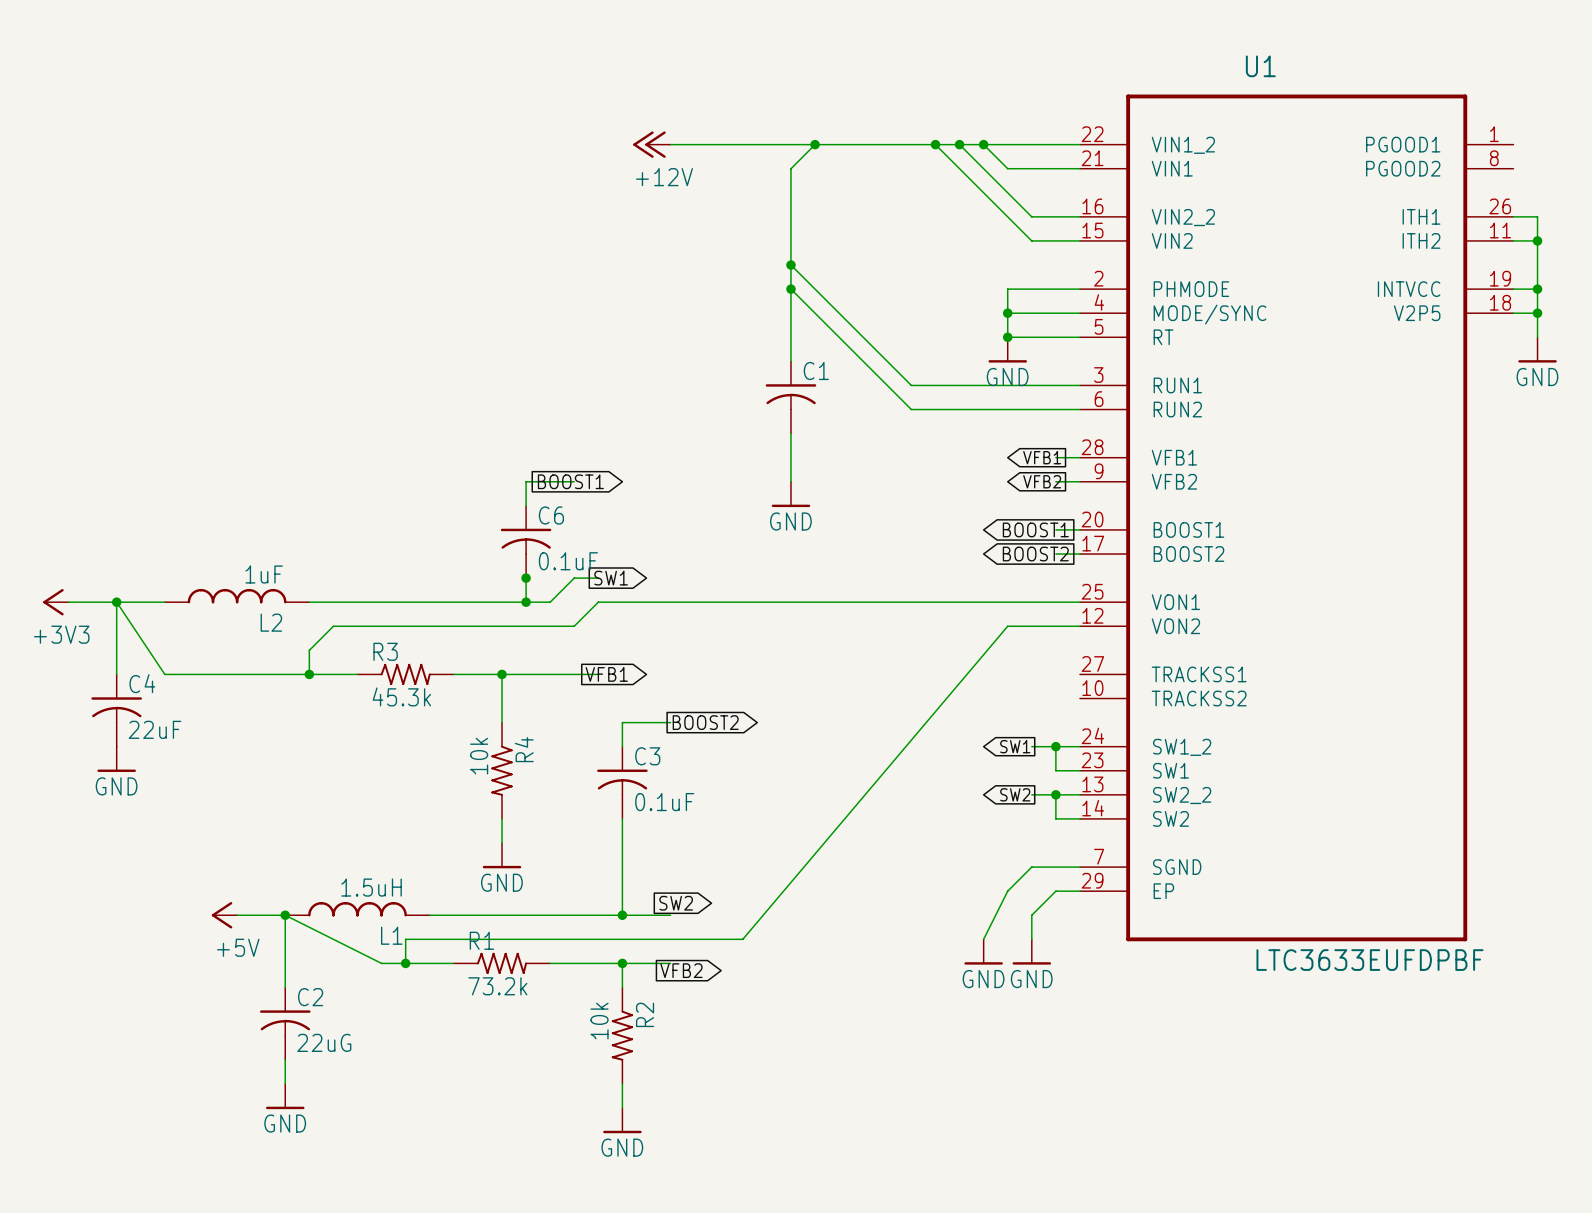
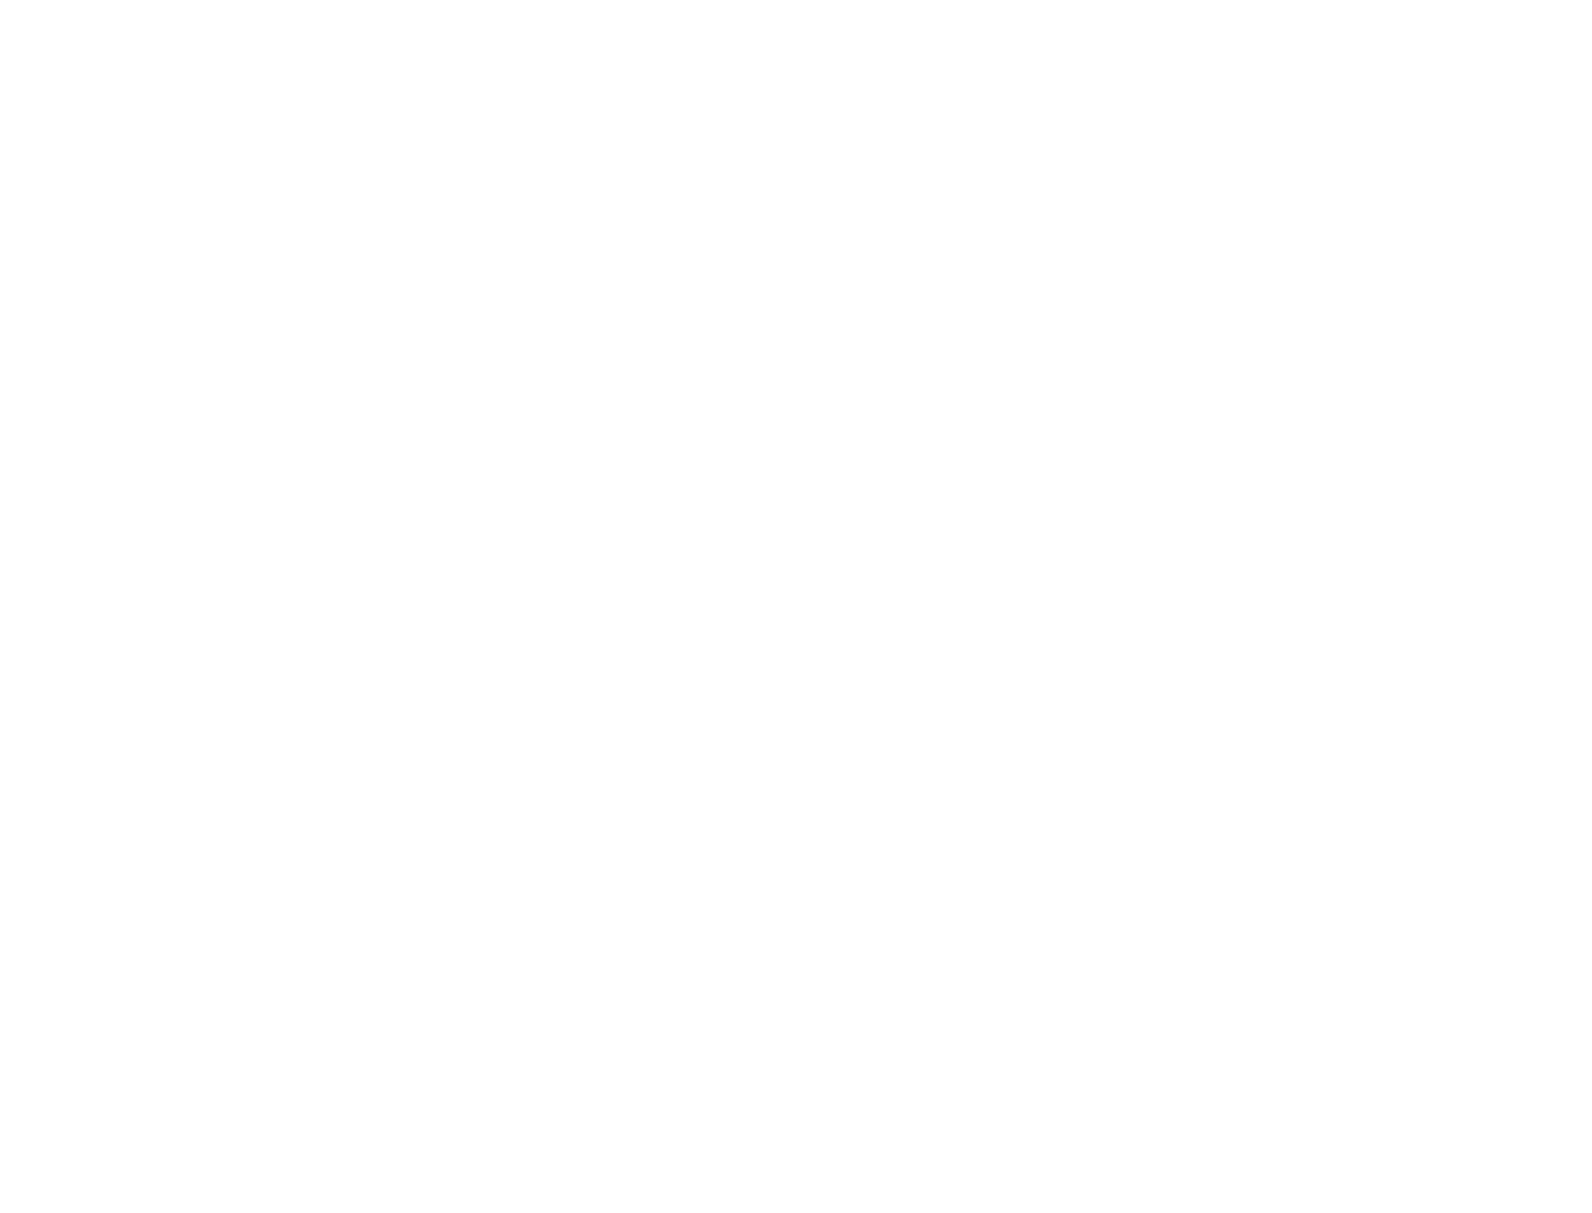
power symbol: +12V (651, 144) -> none
wire: (670, 144) (1079, 144) -> none
wire: (815, 144) (790, 168) (790, 361) -> none
junction: (815, 144) -> none
wire: (935, 144) (1031, 240) (1079, 240) -> none
junction: (935, 144) -> none
wire: (959, 144) (1031, 216) (1079, 216) -> none
junction: (959, 144) -> none
wire: (983, 144) (1007, 168) (1079, 168) -> none
junction: (983, 144) -> none
wire: (1513, 216) (1537, 216) (1537, 337) -> none
wire: (1513, 240) (1537, 240) -> none
junction: (1537, 240) -> none
wire: (790, 265) (911, 385) (1079, 385) -> none
junction: (790, 265) -> none
wire: (790, 289) (911, 409) (1079, 409) -> none
junction: (790, 289) -> none
wire: (1079, 289) (1007, 289) (1007, 337) (1079, 337) -> none
wire: (1513, 289) (1537, 289) -> none
junction: (1537, 289) -> none
wire: (1007, 313) (1079, 313) -> none
junction: (1007, 313) -> none
wire: (1513, 313) (1537, 313) -> none
junction: (1537, 313) -> none
junction: (1007, 337) -> none
power symbol: GND (1007, 349) -> none
power symbol: GND (1537, 349) -> none
C1: (790, 397) -> none
wire: (790, 433) (790, 481) -> none
global label: VFB1 (1042, 457) -> none
wire: (1055, 457) (1079, 457) -> none
global label: BOOST1 (570, 481) -> none
wire: (574, 481) (526, 481) (526, 505) -> none
global label: VFB2 (1042, 481) -> none
wire: (1055, 481) (1079, 481) -> none
power symbol: GND (790, 494) -> none
U1: LTC3633EUFDPBF (1296, 517) -> none
global label: BOOST1 (1035, 529) -> none
wire: (1055, 529) (1079, 529) -> none
C6: 0.1uF (526, 541) -> none
global label: BOOST2 (1035, 554) -> none
wire: (1055, 554) (1079, 554) -> none
wire: (526, 578) (526, 602) -> none
junction: (526, 578) -> none
wire: (598, 578) (574, 578) (550, 602) (309, 602) -> none
global label: SW1 (611, 578) -> none
L2: 1uF (237, 596) -> none
power symbol: +3V3 (55, 602) -> none
wire: (68, 602) (164, 602) -> none
junction: (116, 602) -> none
junction: (526, 602) -> none
wire: (1079, 602) (598, 602) (574, 626) (333, 626) (309, 650) (309, 674) -> none
wire: (1079, 626) (1007, 626) (742, 939) (405, 939) (405, 963) -> none
wire: (116, 674) (116, 602) (164, 674) (357, 674) -> none
junction: (309, 674) -> none
R3: 45.3k (405, 674) -> none
wire: (453, 674) (598, 674) -> none
wire: (502, 674) (502, 722) -> none
junction: (502, 674) -> none
global label: VFB1 (606, 674) -> none
C4: 22uF (116, 710) -> none
wire: (670, 722) (622, 722) (622, 746) -> none
global label: BOOST2 (705, 722) -> none
global label: SW1 (1015, 746) -> none
wire: (1031, 746) (1079, 746) -> none
wire: (1055, 746) (1055, 770) (1079, 770) -> none
junction: (1055, 746) -> none
power symbol: GND (116, 759) -> none
R4: 10k (502, 770) -> none
C3: 0.1uF (622, 782) -> none
global label: SW2 (1015, 794) -> none
wire: (1031, 794) (1079, 794) -> none
wire: (1055, 794) (1055, 818) (1079, 818) -> none
junction: (1055, 794) -> none
wire: (502, 818) (502, 843) -> none
wire: (622, 818) (622, 915) -> none
power symbol: GND (502, 855) -> none
wire: (1079, 867) (1031, 867) (1007, 891) (983, 939) -> none
wire: (1079, 891) (1055, 891) (1031, 915) (1031, 939) -> none
global label: SW2 (676, 903) -> none
L1: 1.5uH (357, 909) -> none
power symbol: +5V (224, 915) -> none
wire: (237, 915) (285, 915) -> none
wire: (285, 915) (285, 987) -> none
wire: (285, 915) (381, 963) (453, 963) -> none
junction: (285, 915) -> none
wire: (429, 915) (670, 915) -> none
junction: (622, 915) -> none
power symbol: GND (983, 951) -> none
power symbol: GND (1031, 951) -> none
junction: (405, 963) -> none
R1: 73.2k (502, 963) -> none
wire: (550, 963) (670, 963) -> none
wire: (622, 963) (622, 987) -> none
junction: (622, 963) -> none
global label: VFB2 (681, 970) -> none
C2: 22uG (285, 1023) -> none
R2: 10k (622, 1035) -> none
wire: (285, 1059) (285, 1083) -> none
wire: (622, 1083) (622, 1107) -> none
power symbol: GND (285, 1096) -> none
power symbol: GND (622, 1120) -> none

